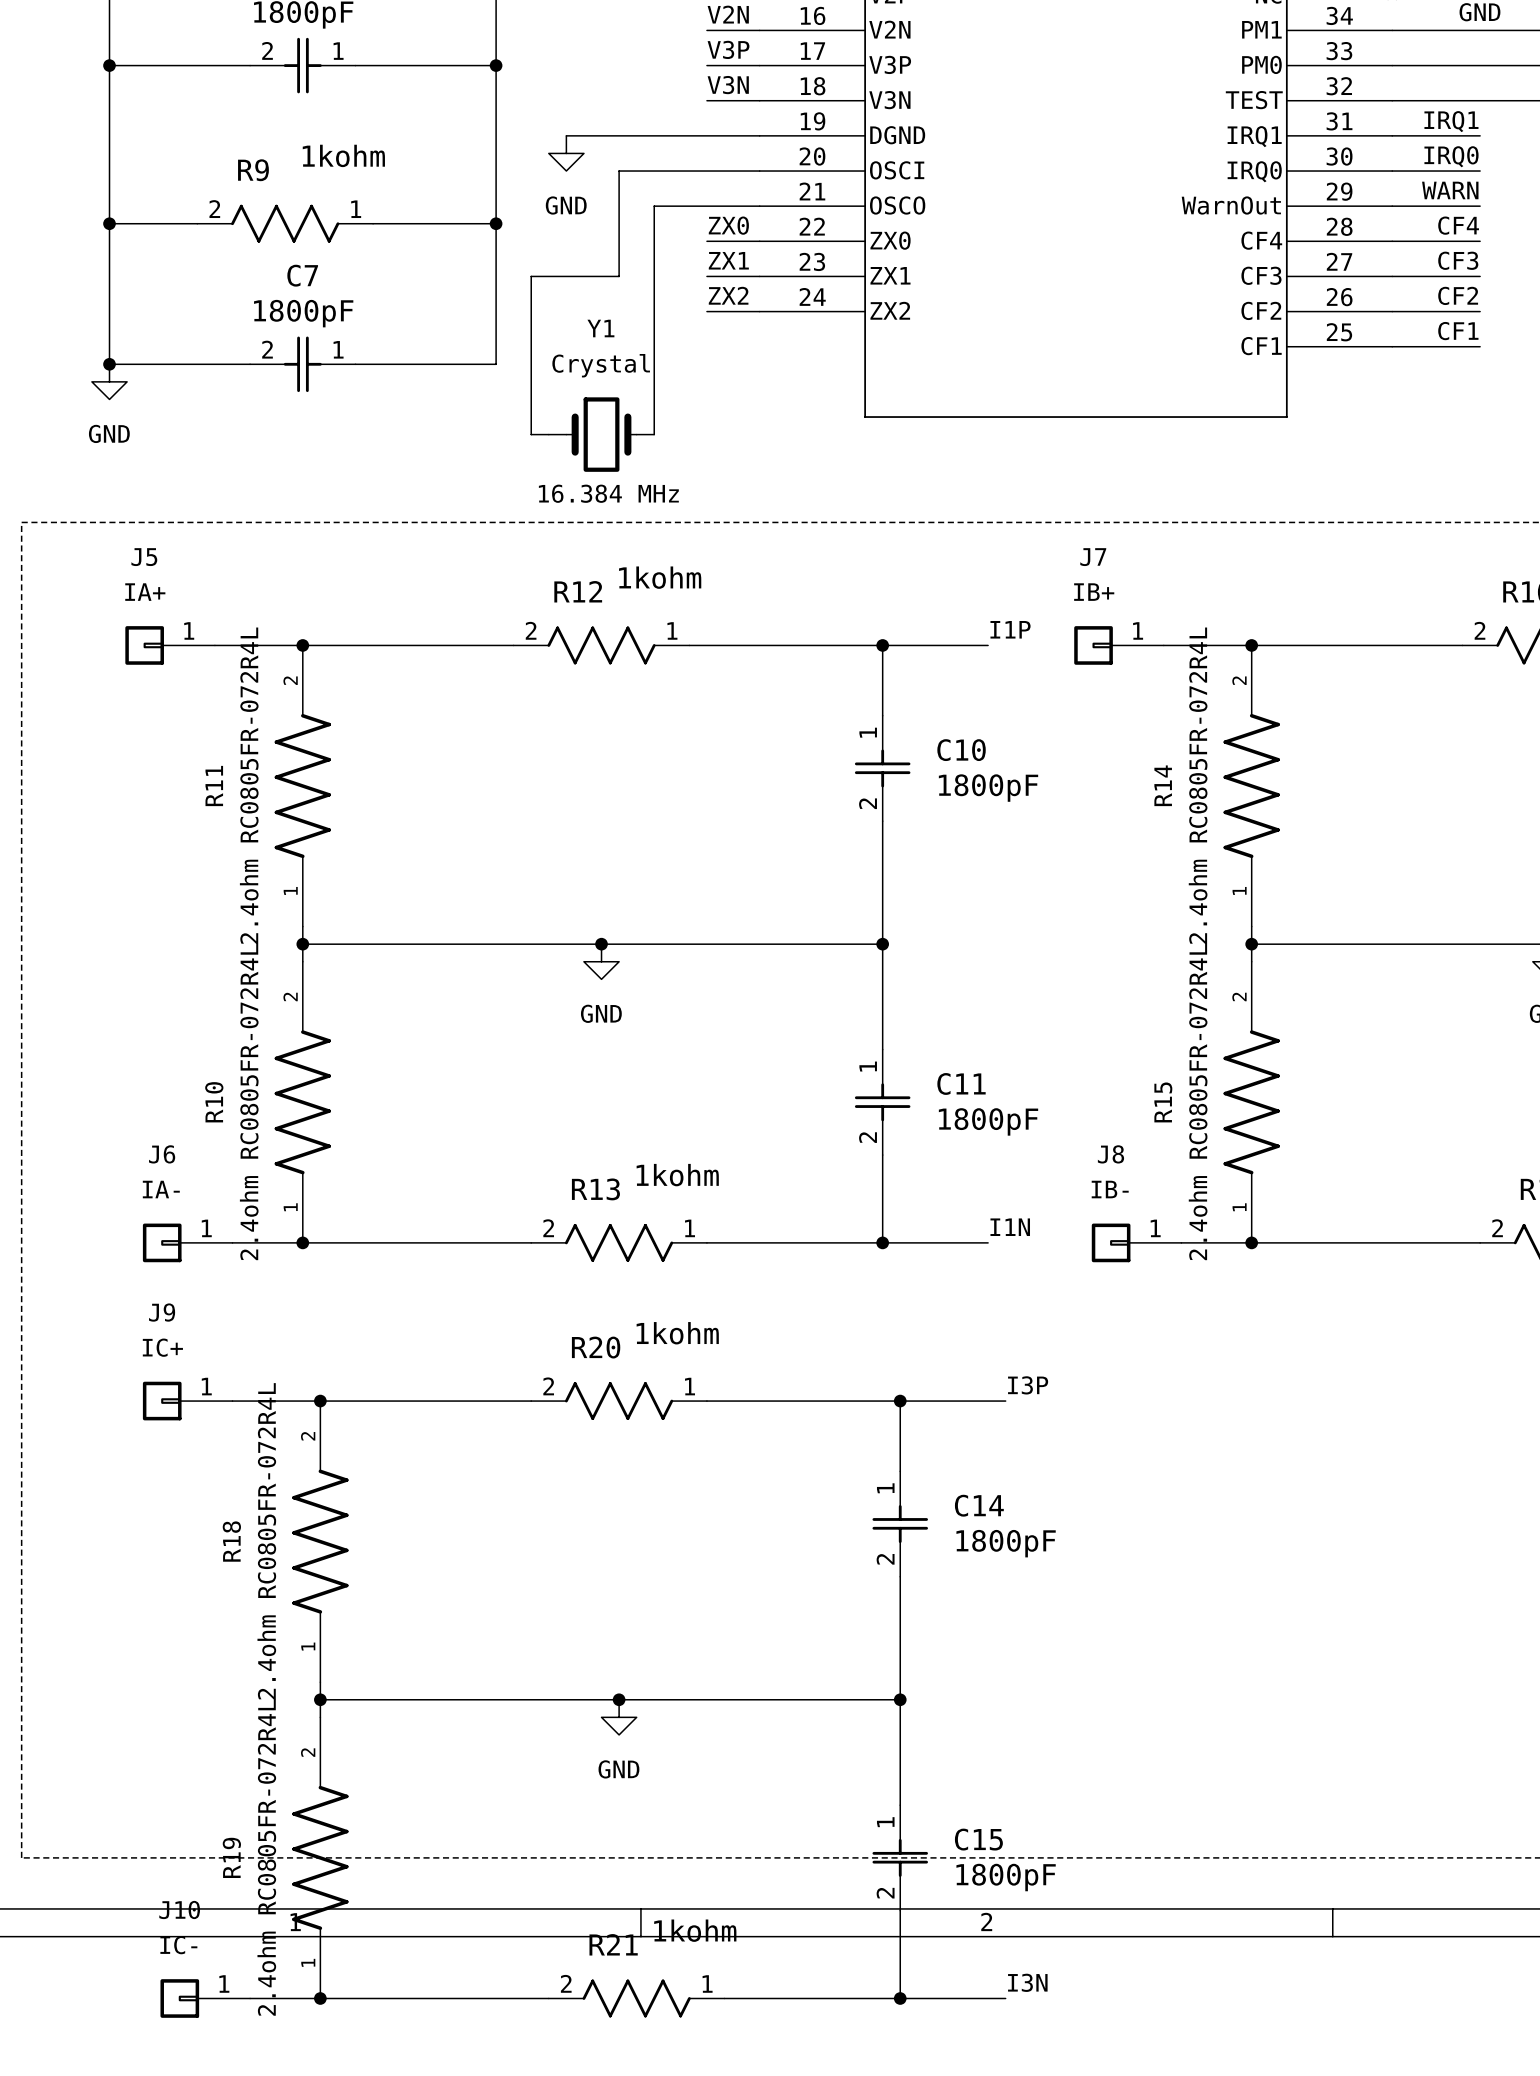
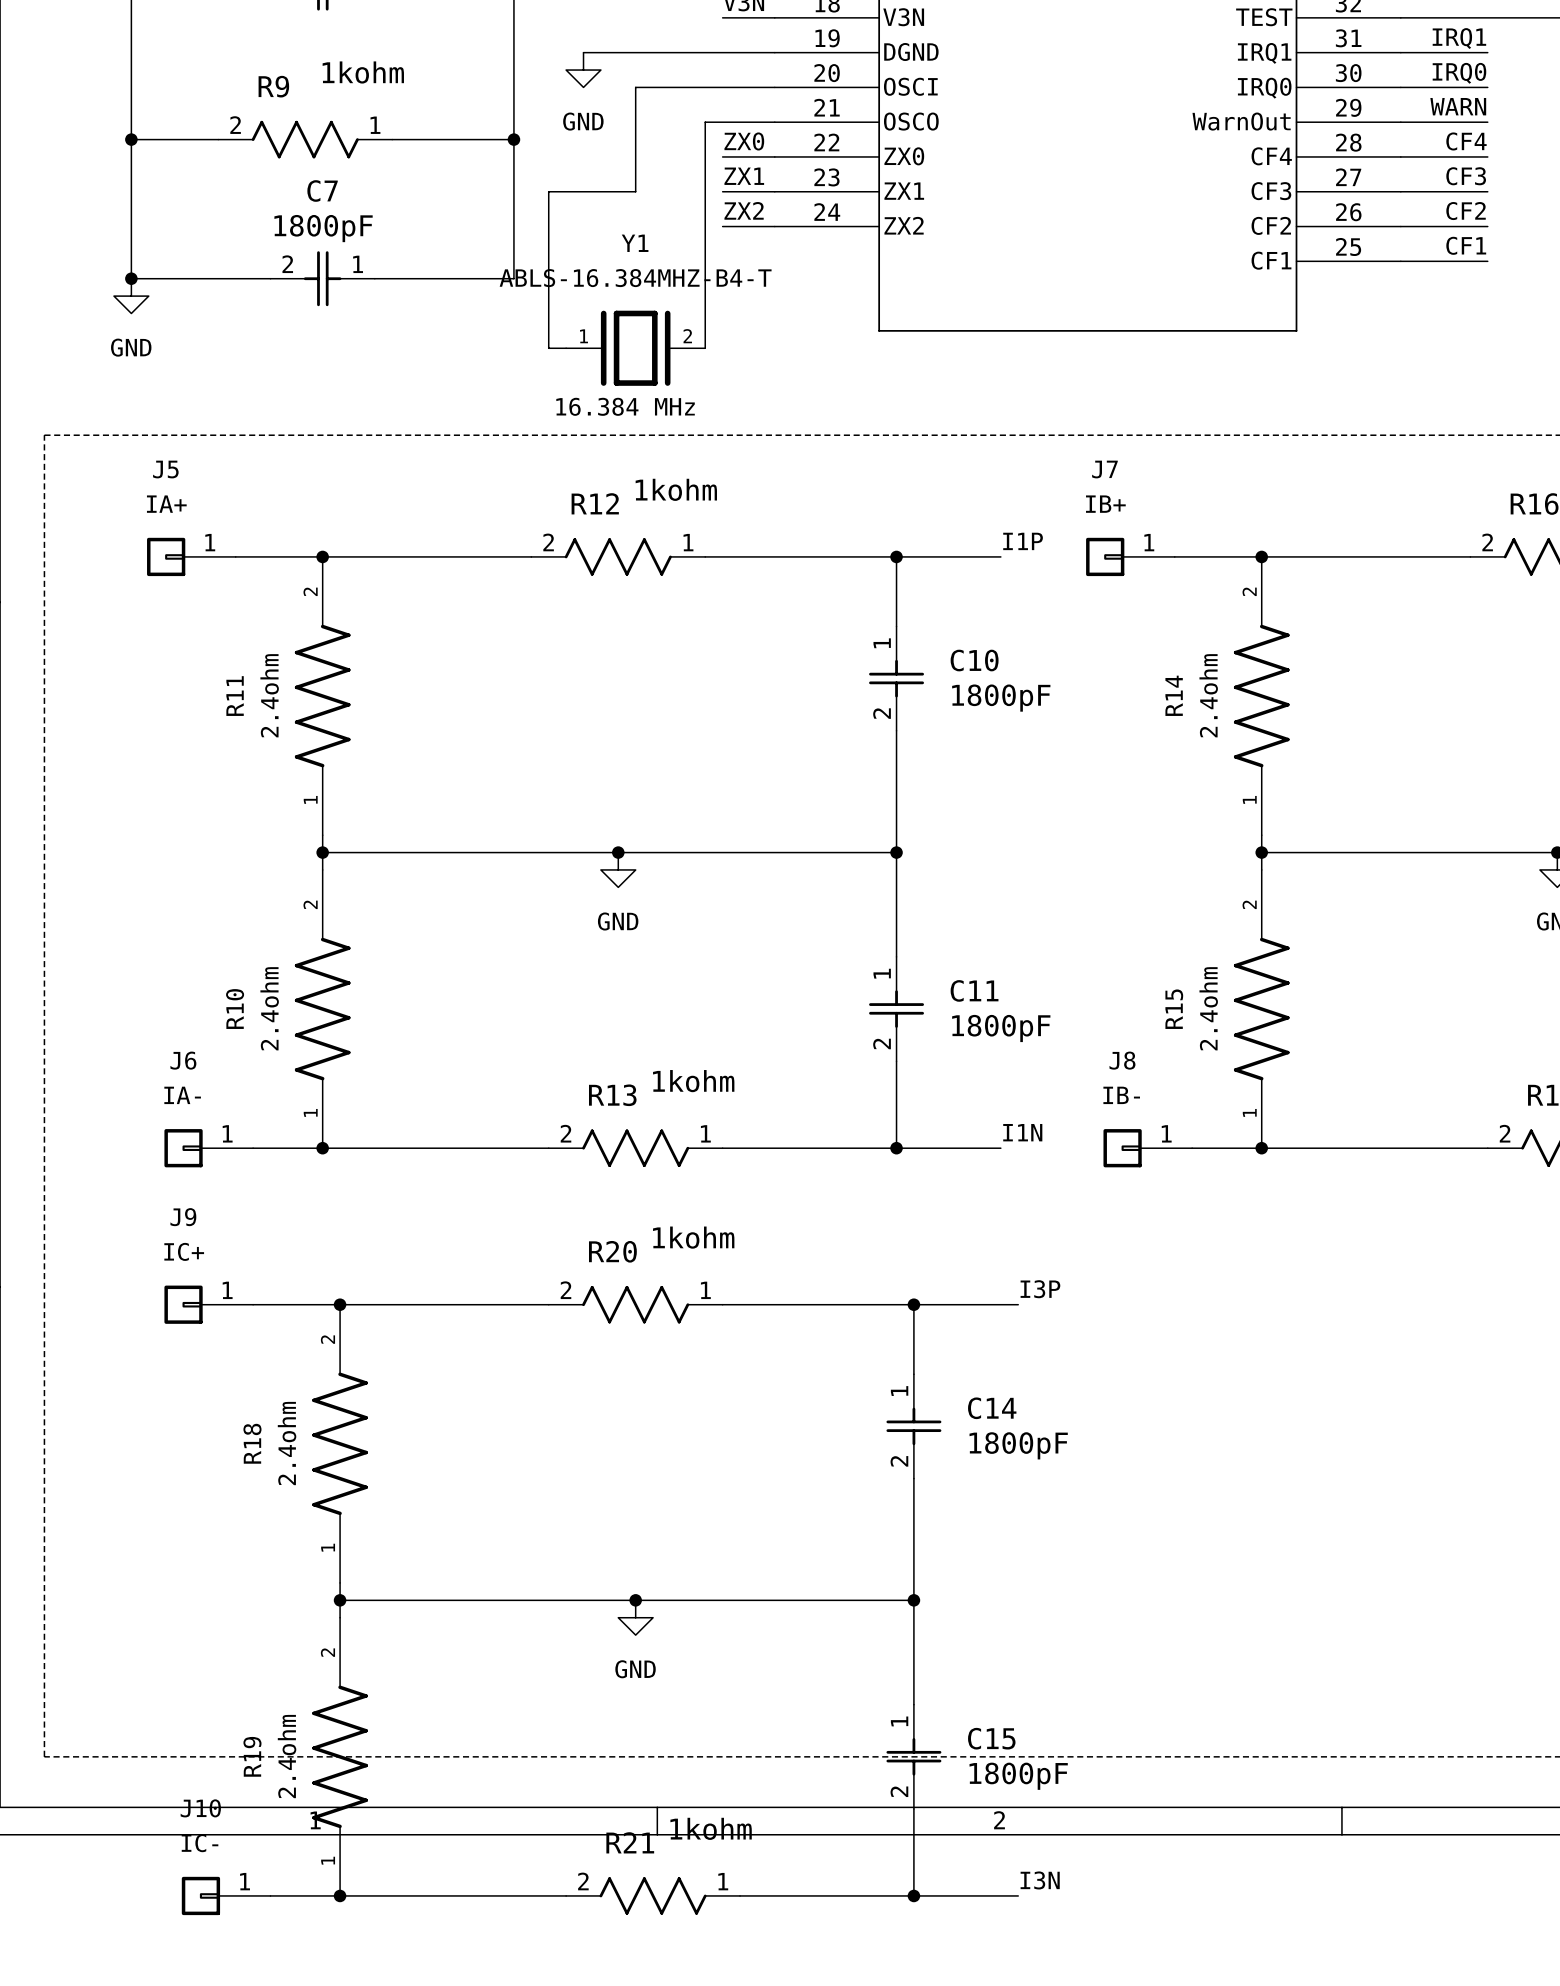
wire: (689, 206) (654, 206) (654, 434) -> (705, 122) (705, 348)
Y1 value: Crystal (601, 365) -> ABLS-16.384MHZ-B4-T (635, 278)
Y1 symbol: [548, 397, 655, 472] -> [566, 310, 706, 386]
R11 value: 2.4ohm RC0805FR-072R4L (249, 785) -> 2.4ohm (269, 695)
R14 value: 2.4ohm RC0805FR-072R4L (1198, 785) -> 2.4ohm (1208, 695)
R10 value: 2.4ohm RC0805FR-072R4L (249, 1101) -> 2.4ohm (269, 1008)
R15 value: 2.4ohm RC0805FR-072R4L (1198, 1101) -> 2.4ohm (1208, 1008)
R18 value: 2.4ohm RC0805FR-072R4L (266, 1541) -> 2.4ohm (287, 1443)
R19 value: 2.4ohm RC0805FR-072R4L (266, 1857) -> 2.4ohm (287, 1756)

